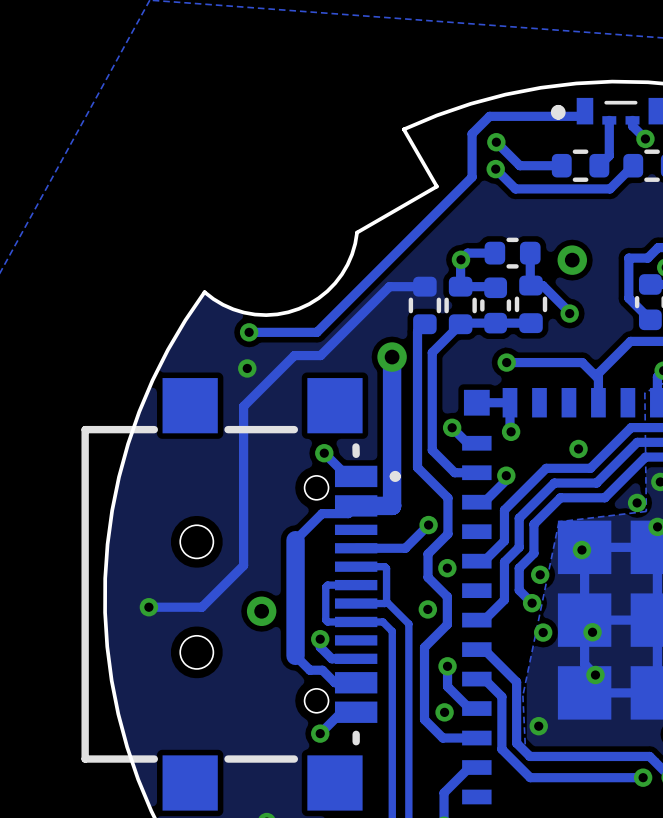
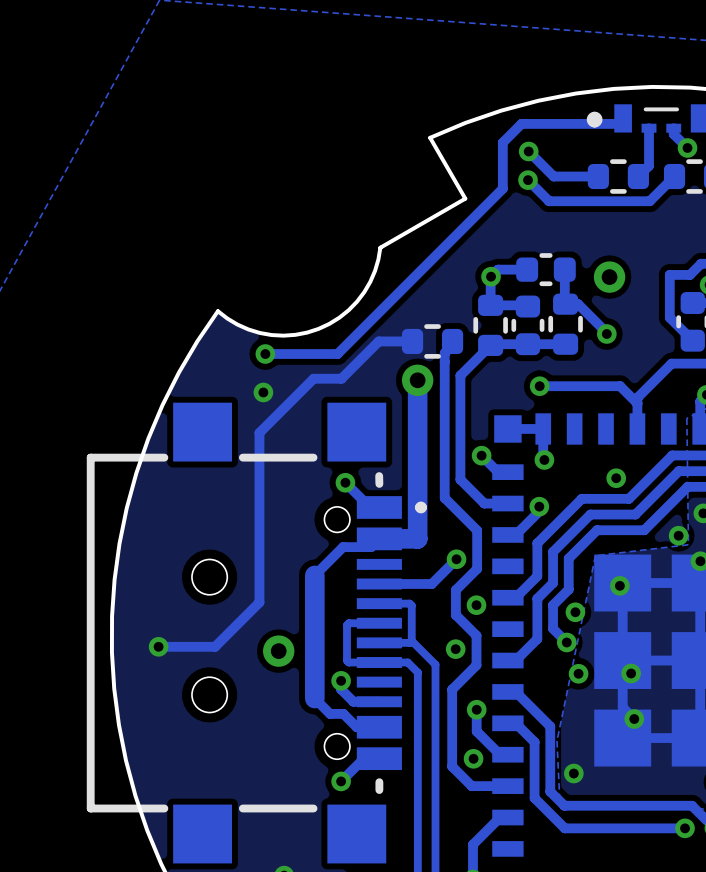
track: (424, 286) (389, 286) (355, 320) -> (412, 341) (378, 341)
part rotation: 0° (424, 305) -> 90° clockwise (432, 341)

